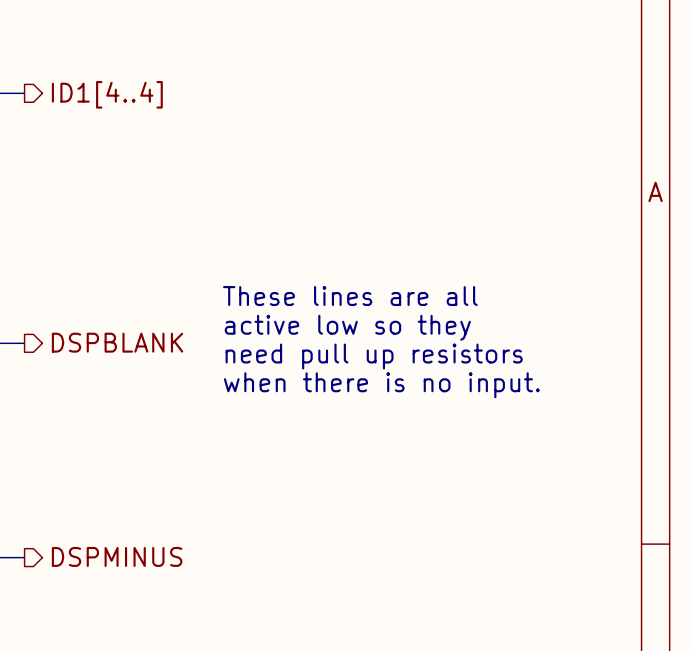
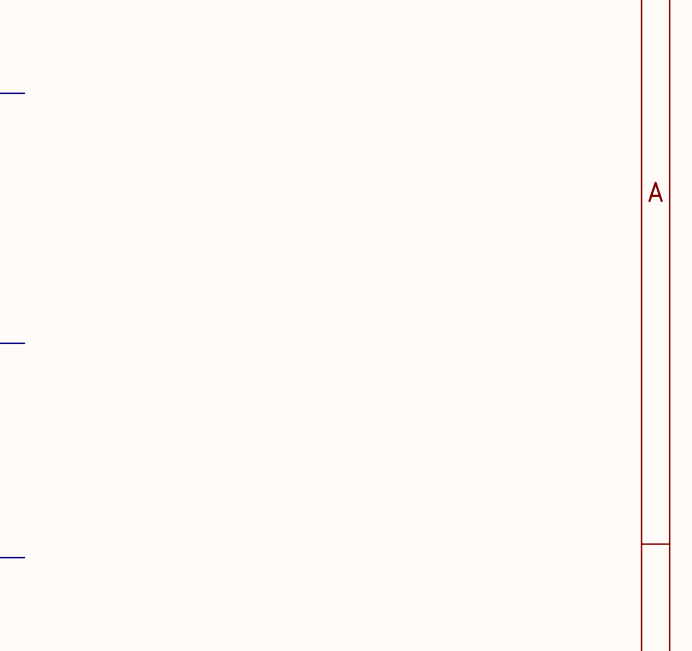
hierarchical label: ID1[4..4] (107, 94) -> none
text: These lines are all (350, 296) -> none
text: active low so they (347, 327) -> none
hierarchical label: DSPBLANK (117, 342) -> none
text: need pull up resistors (374, 356) -> none
text: when there is no input. (381, 385) -> none
hierarchical label: DSPMINUS (117, 556) -> none

